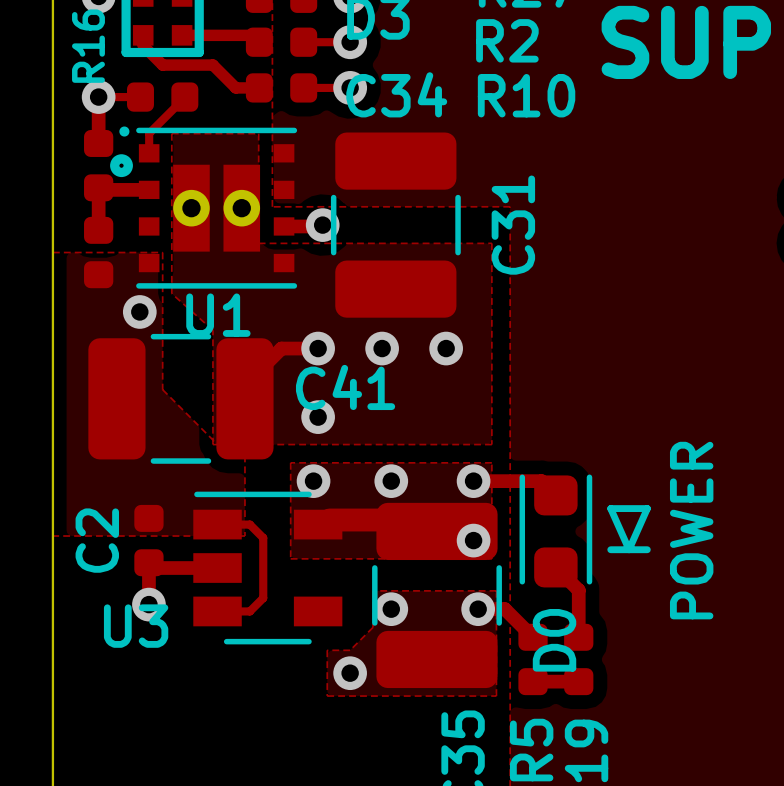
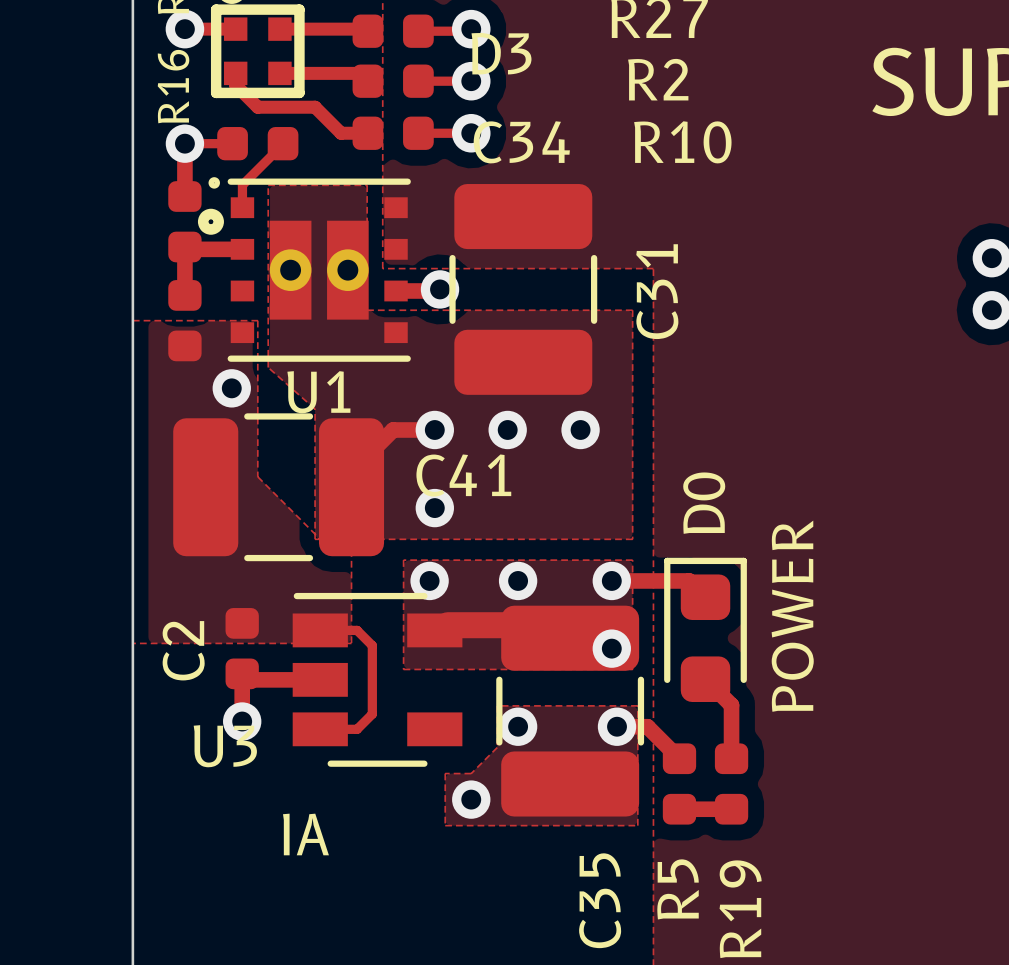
D0 footprint: [519, 474, 593, 588] -> [664, 557, 747, 702]
line: (610, 508) (647, 508) (629, 549) (610, 508) -> none
text position: POWER (691, 530) -> POWER (792, 616)
line: (610, 549) (647, 549) -> none
D0 name position: D0 (554, 640) -> D0 (704, 503)
text: none -> IA (305, 834)

